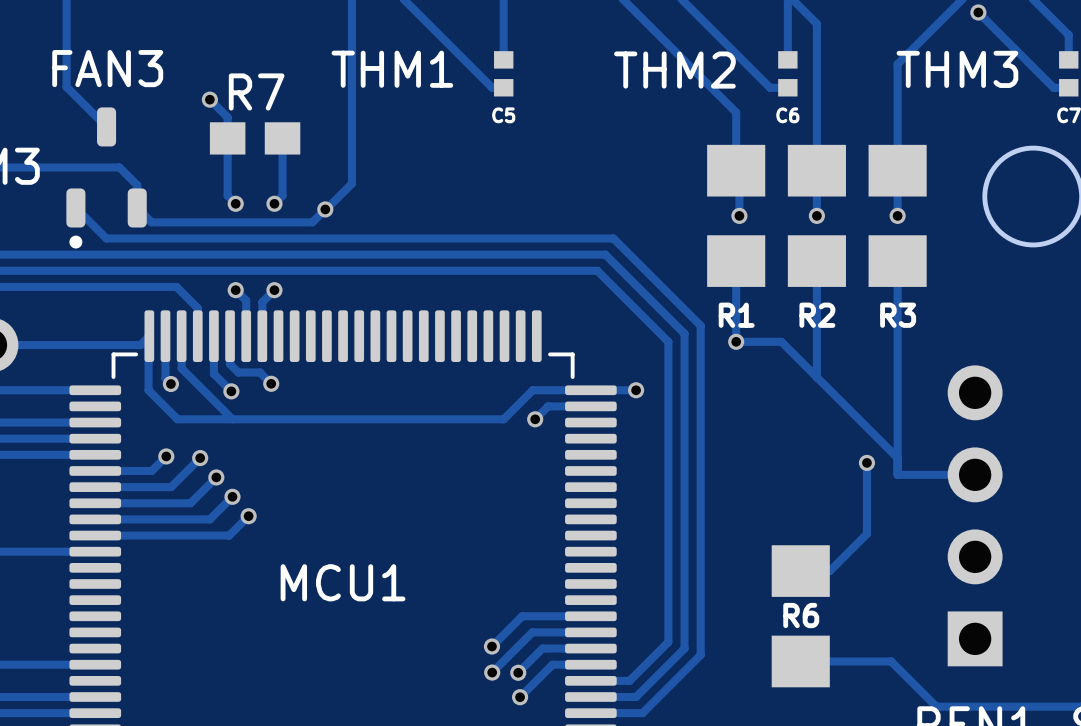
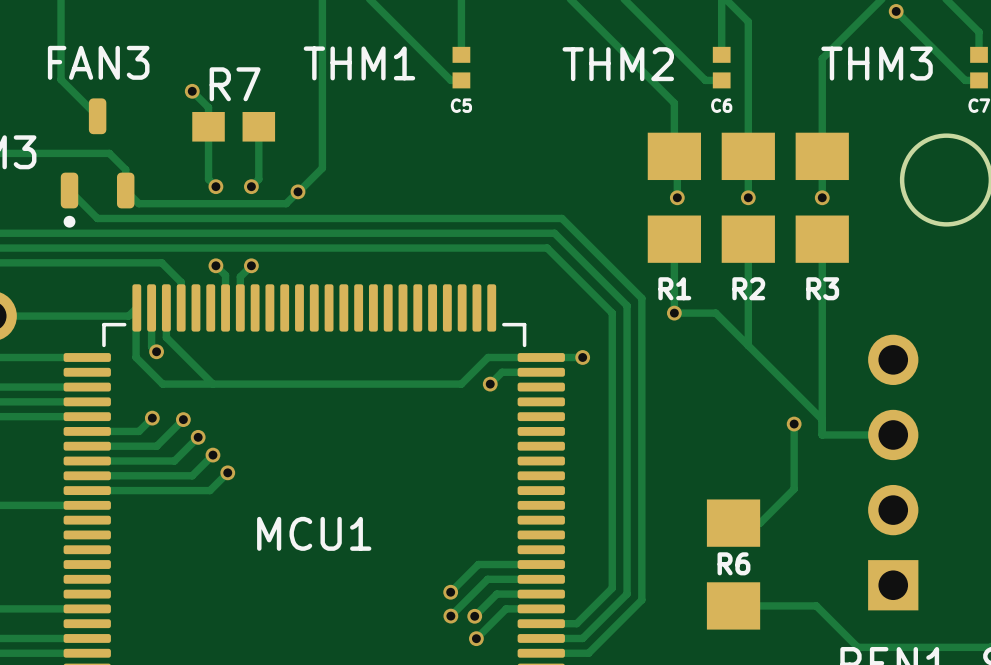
track: (213, 336) (213, 373) (231, 391) -> none
track: (230, 336) (230, 364) (238, 372) (259, 372) (271, 383) -> none
via: (271, 383) -> none
via: (231, 391) -> none

